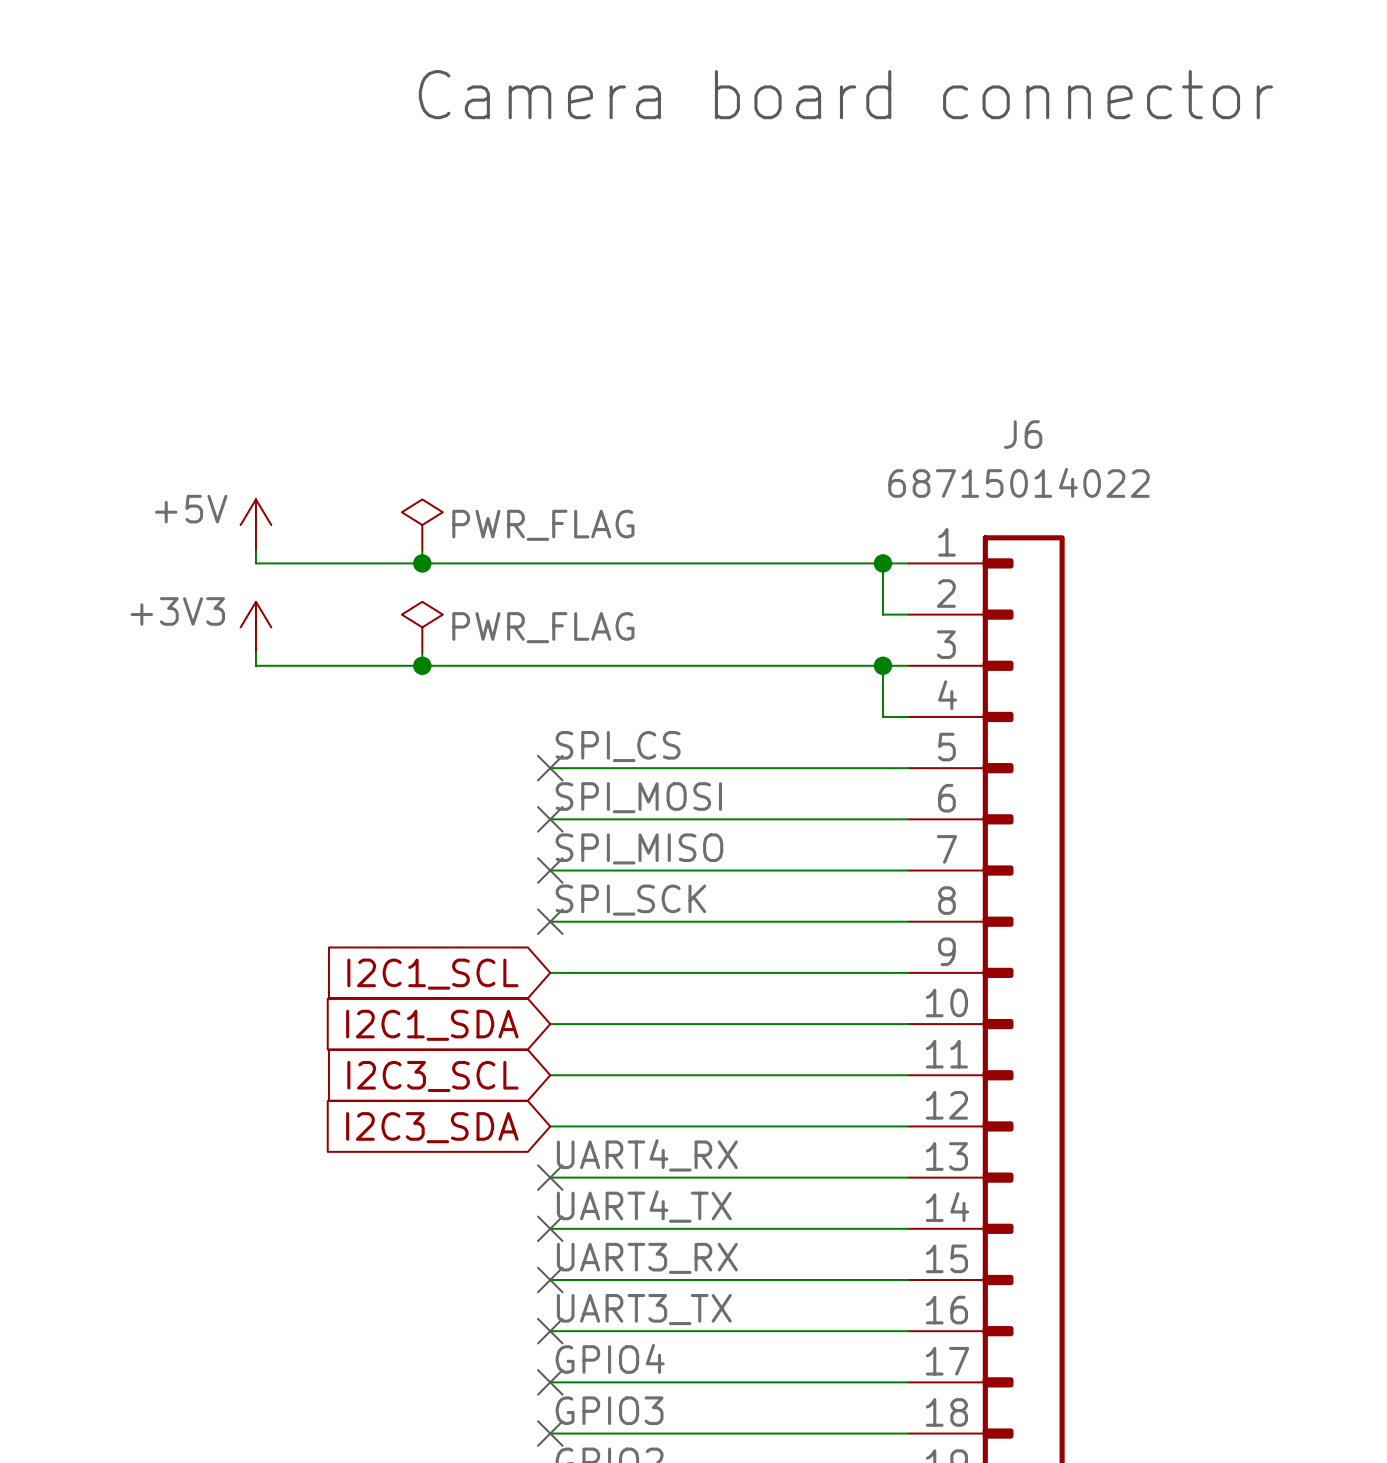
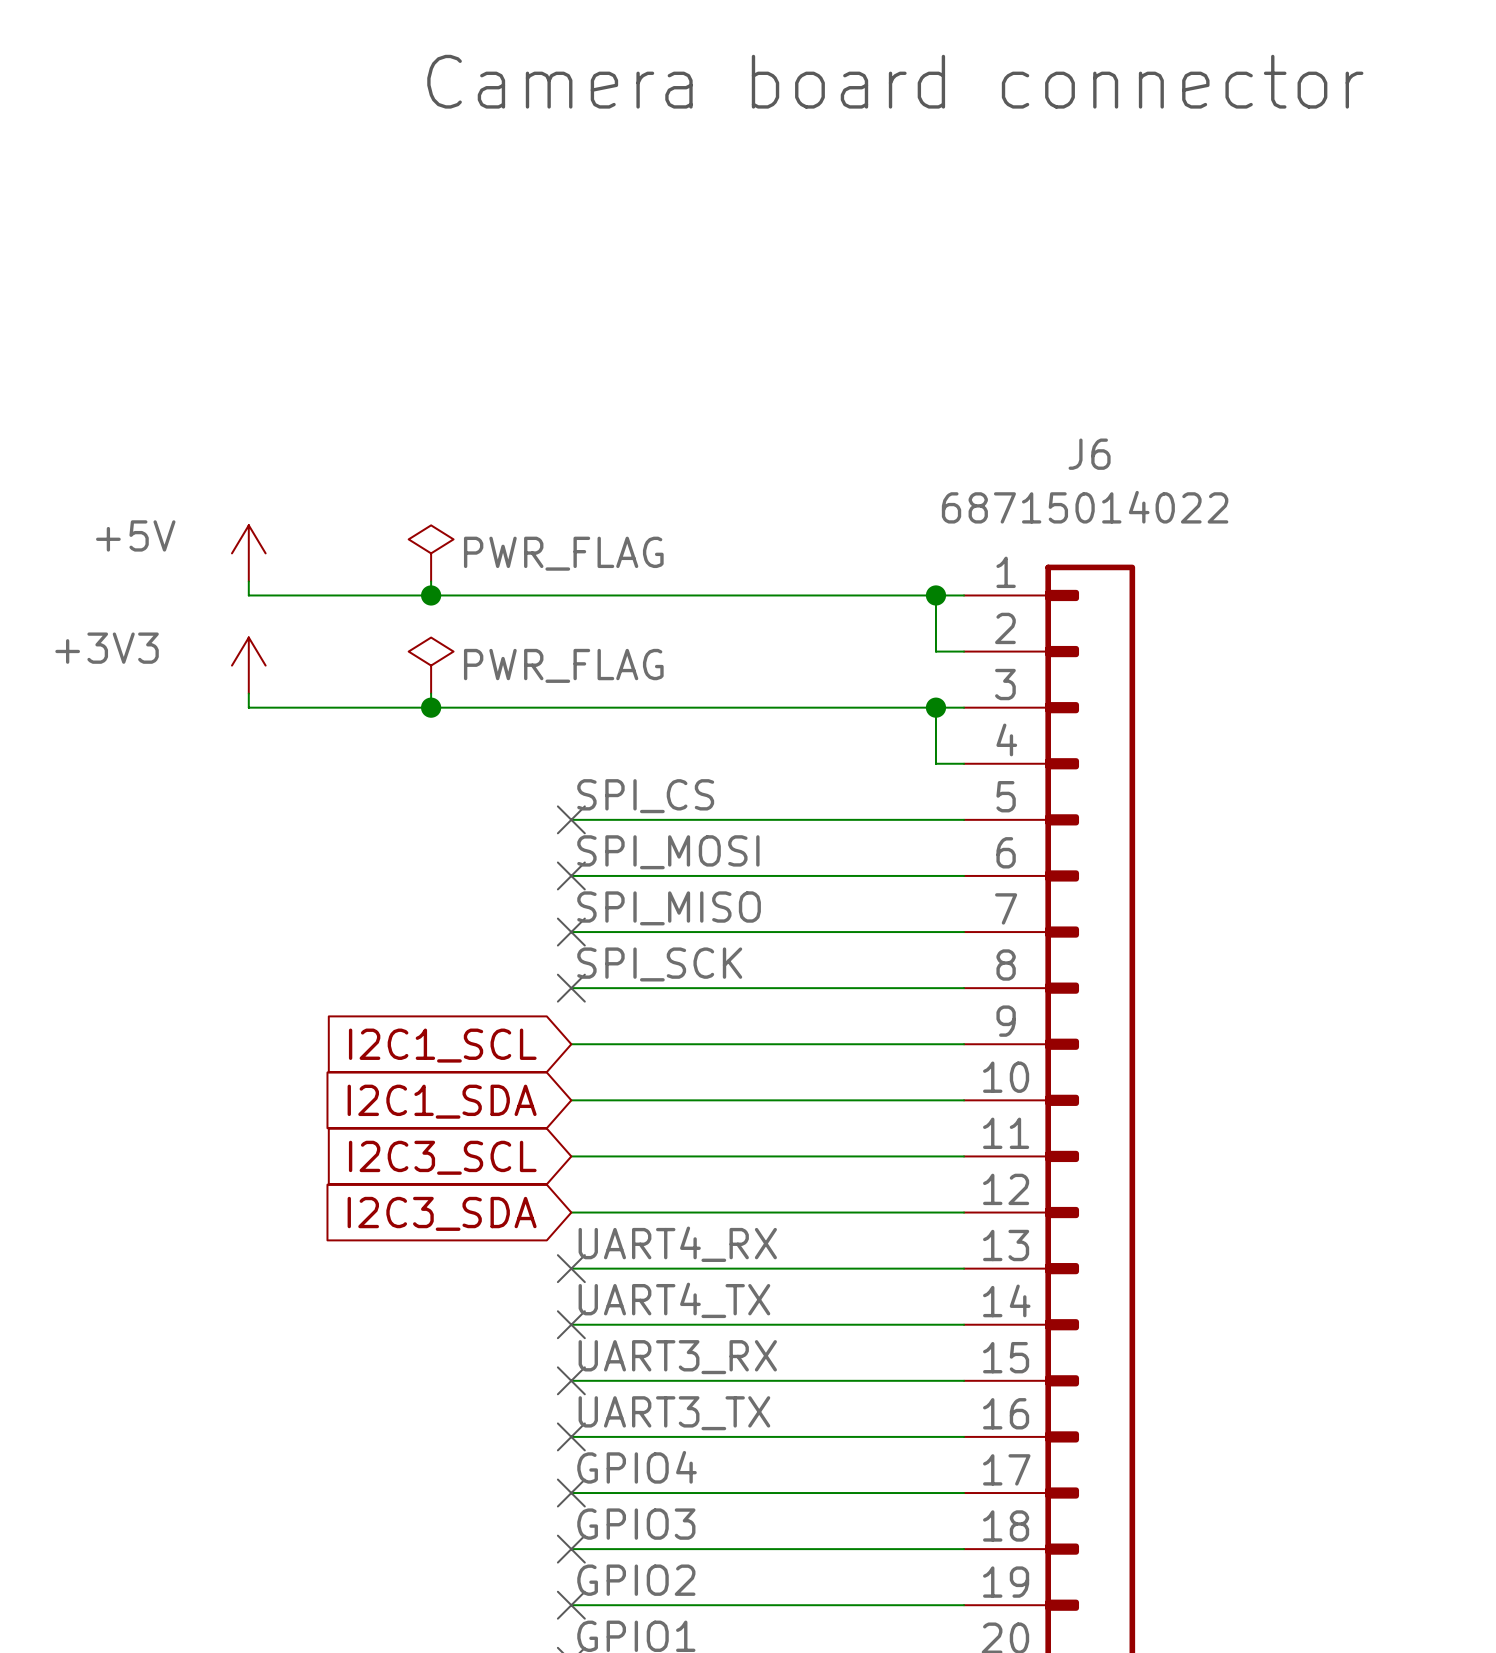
power symbol text position: +5V (191, 509) -> +5V (135, 535)
power symbol text position: +3V3 (177, 611) -> +3V3 (107, 648)

